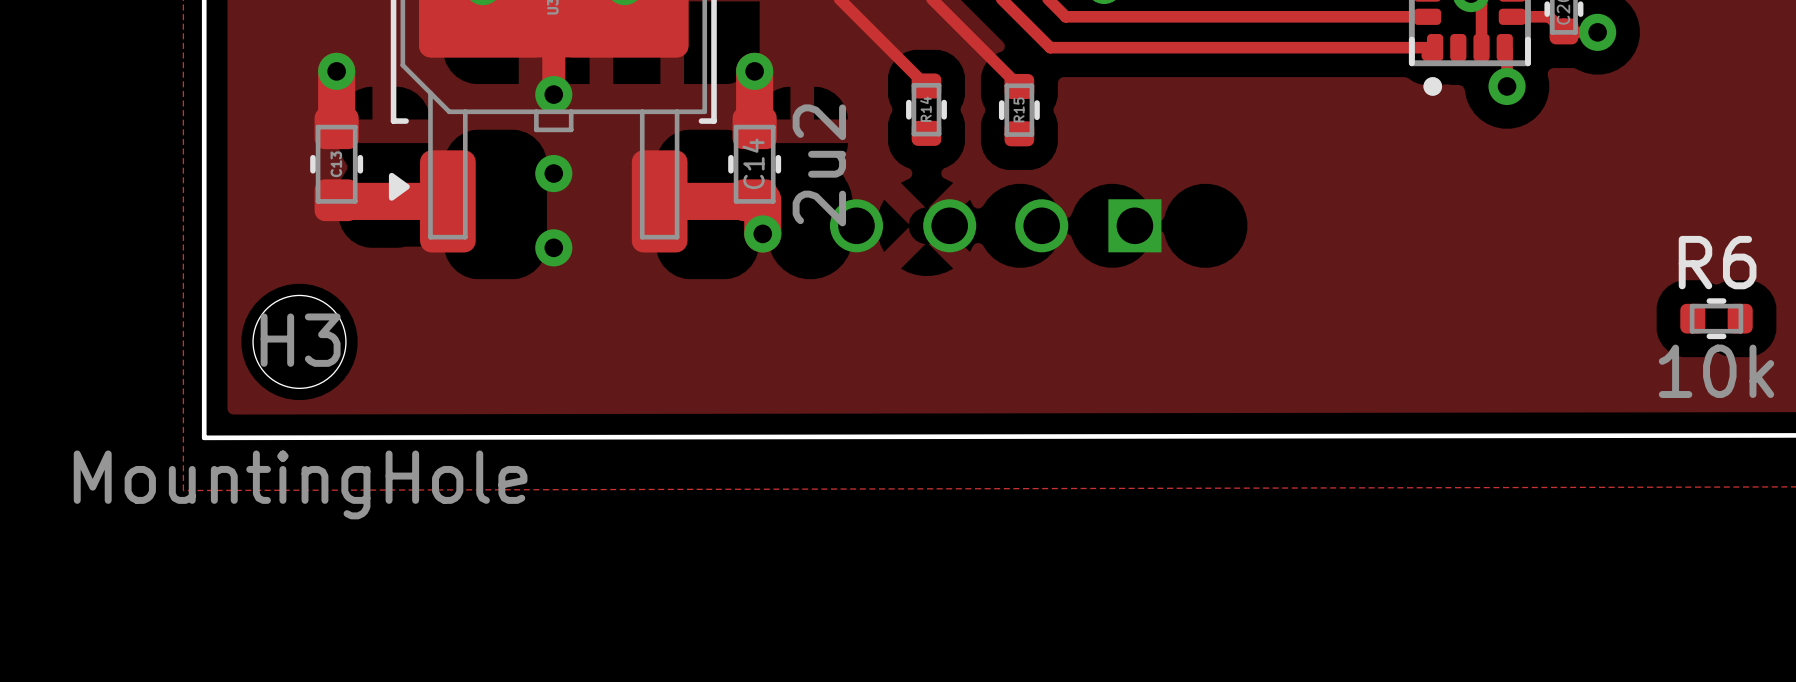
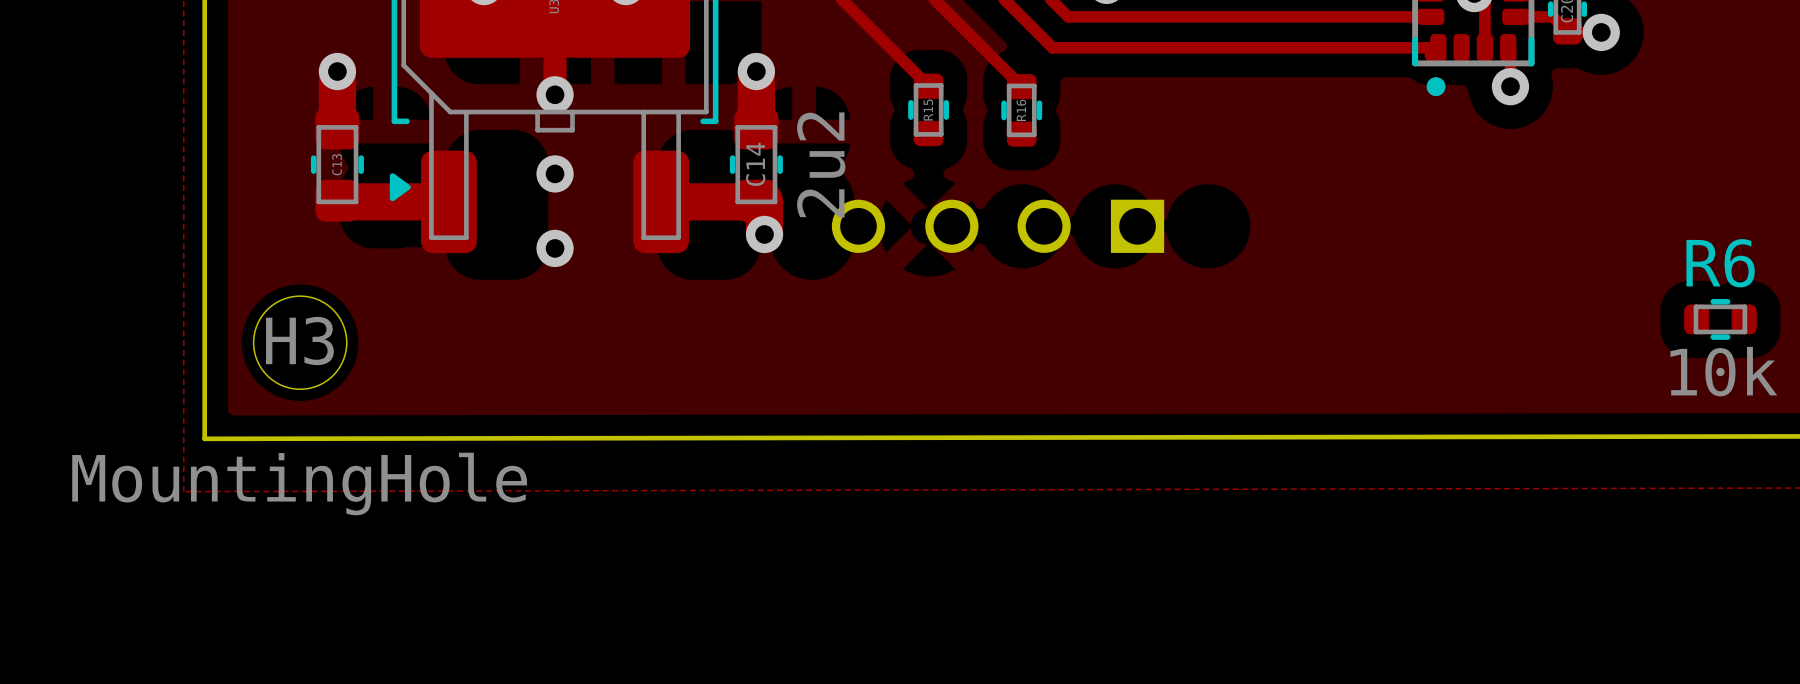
R14 name: R14 (925, 109) -> R15 (928, 110)
R15 name: R15 (1019, 109) -> R16 (1021, 110)

